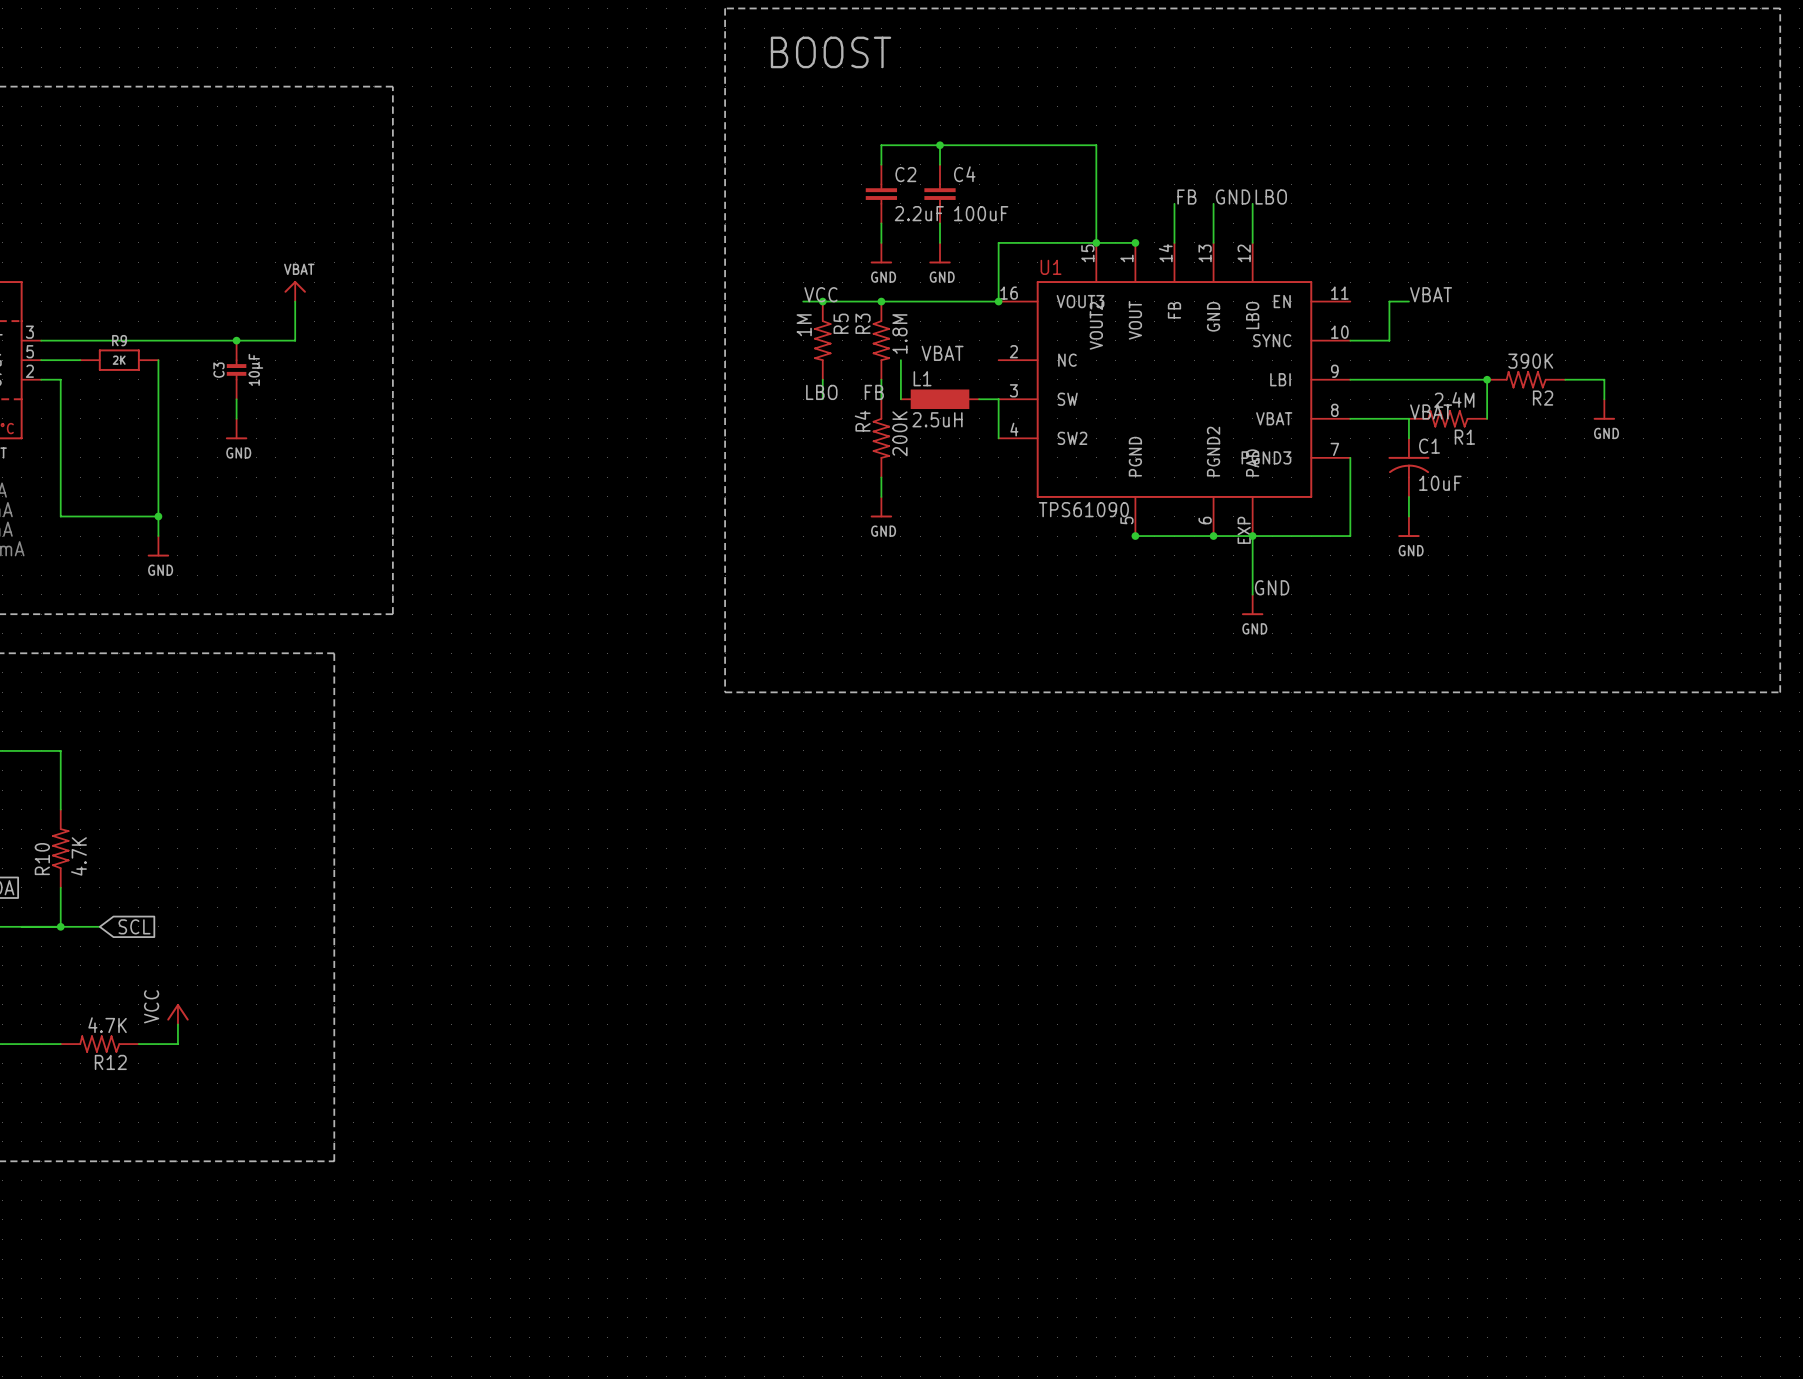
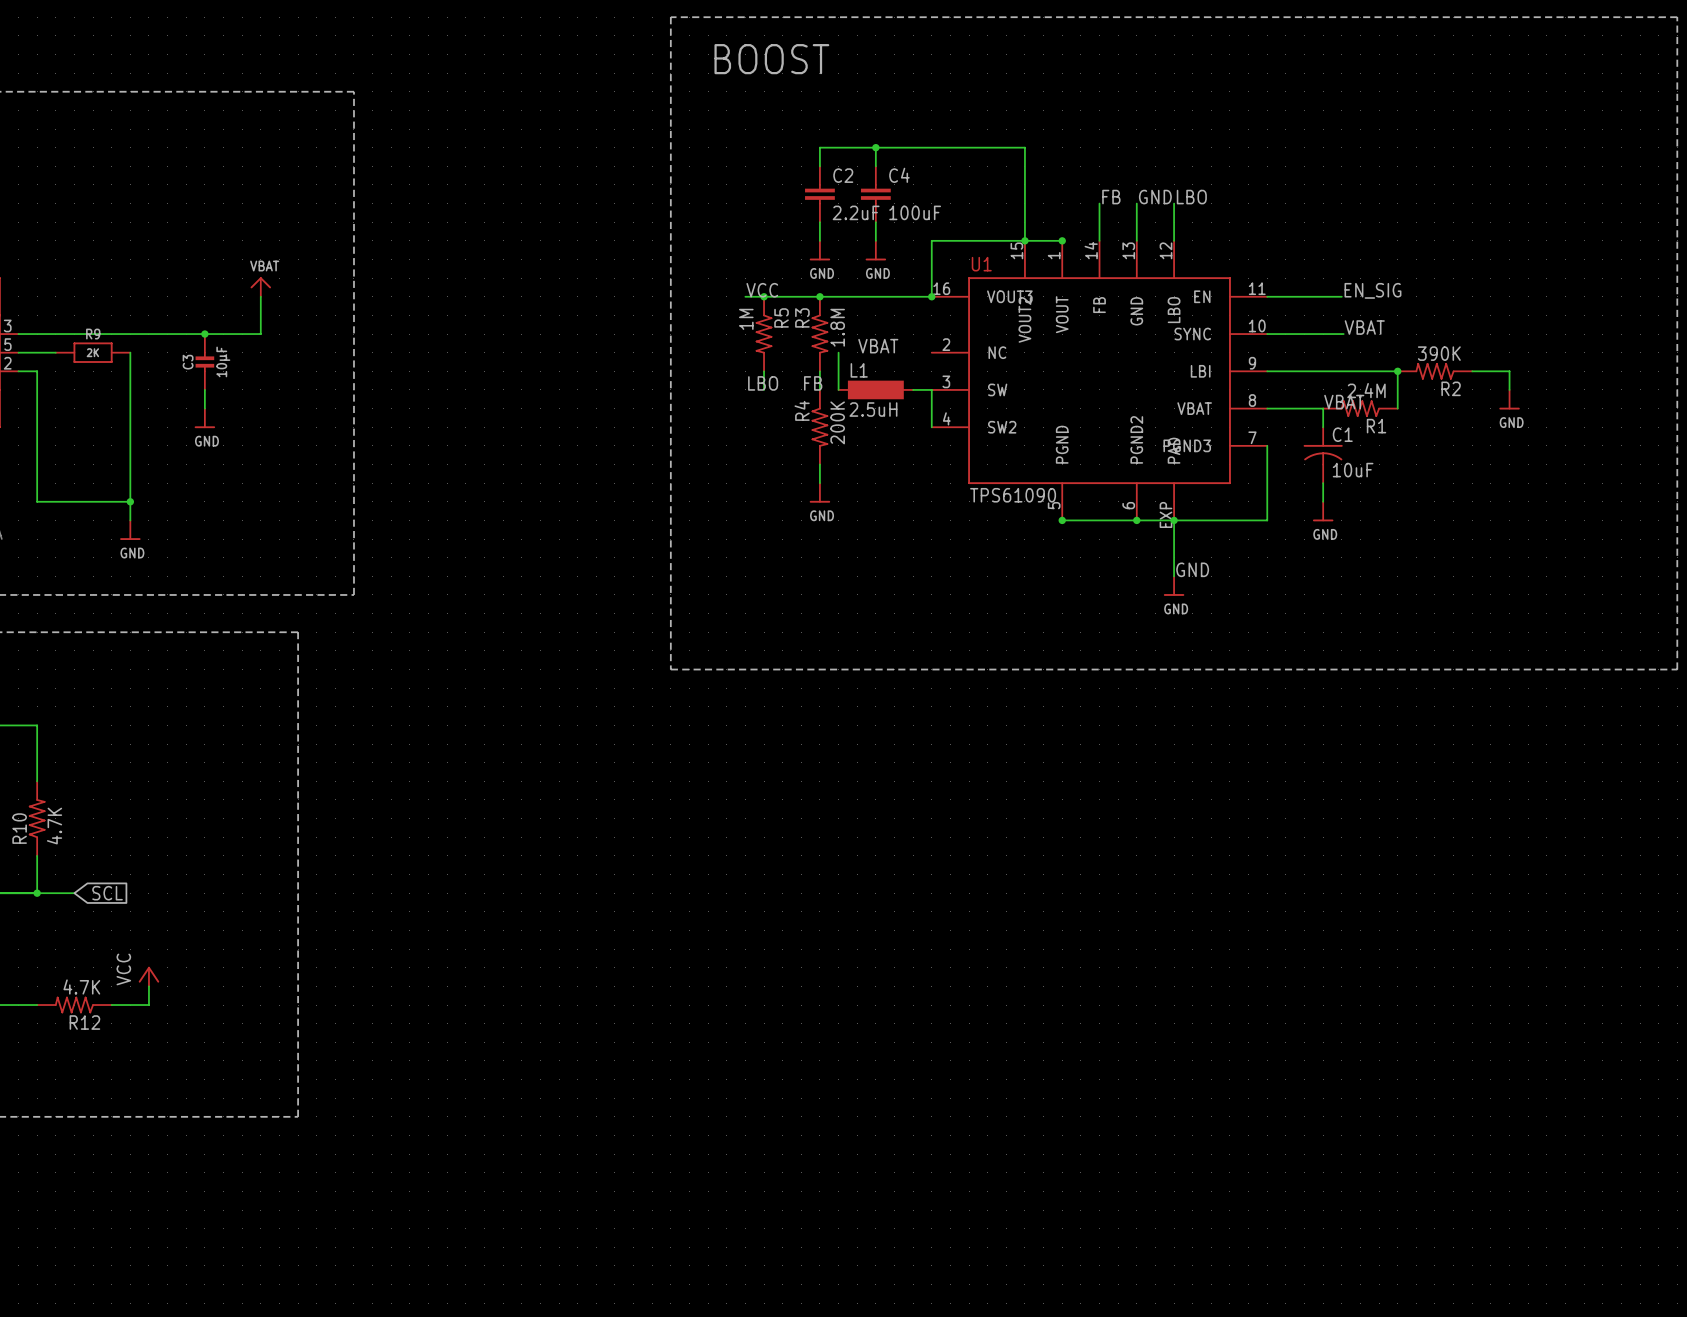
label position: VBAT (1431, 294) -> VBAT (1364, 327)
label: none -> EN_SIG (1372, 290)
wire: (1389, 301) (1389, 340) -> (1304, 296) (1267, 296)
wire: none -> (1323, 296) (1341, 296)
wire: none -> (1304, 334) (1343, 334)

